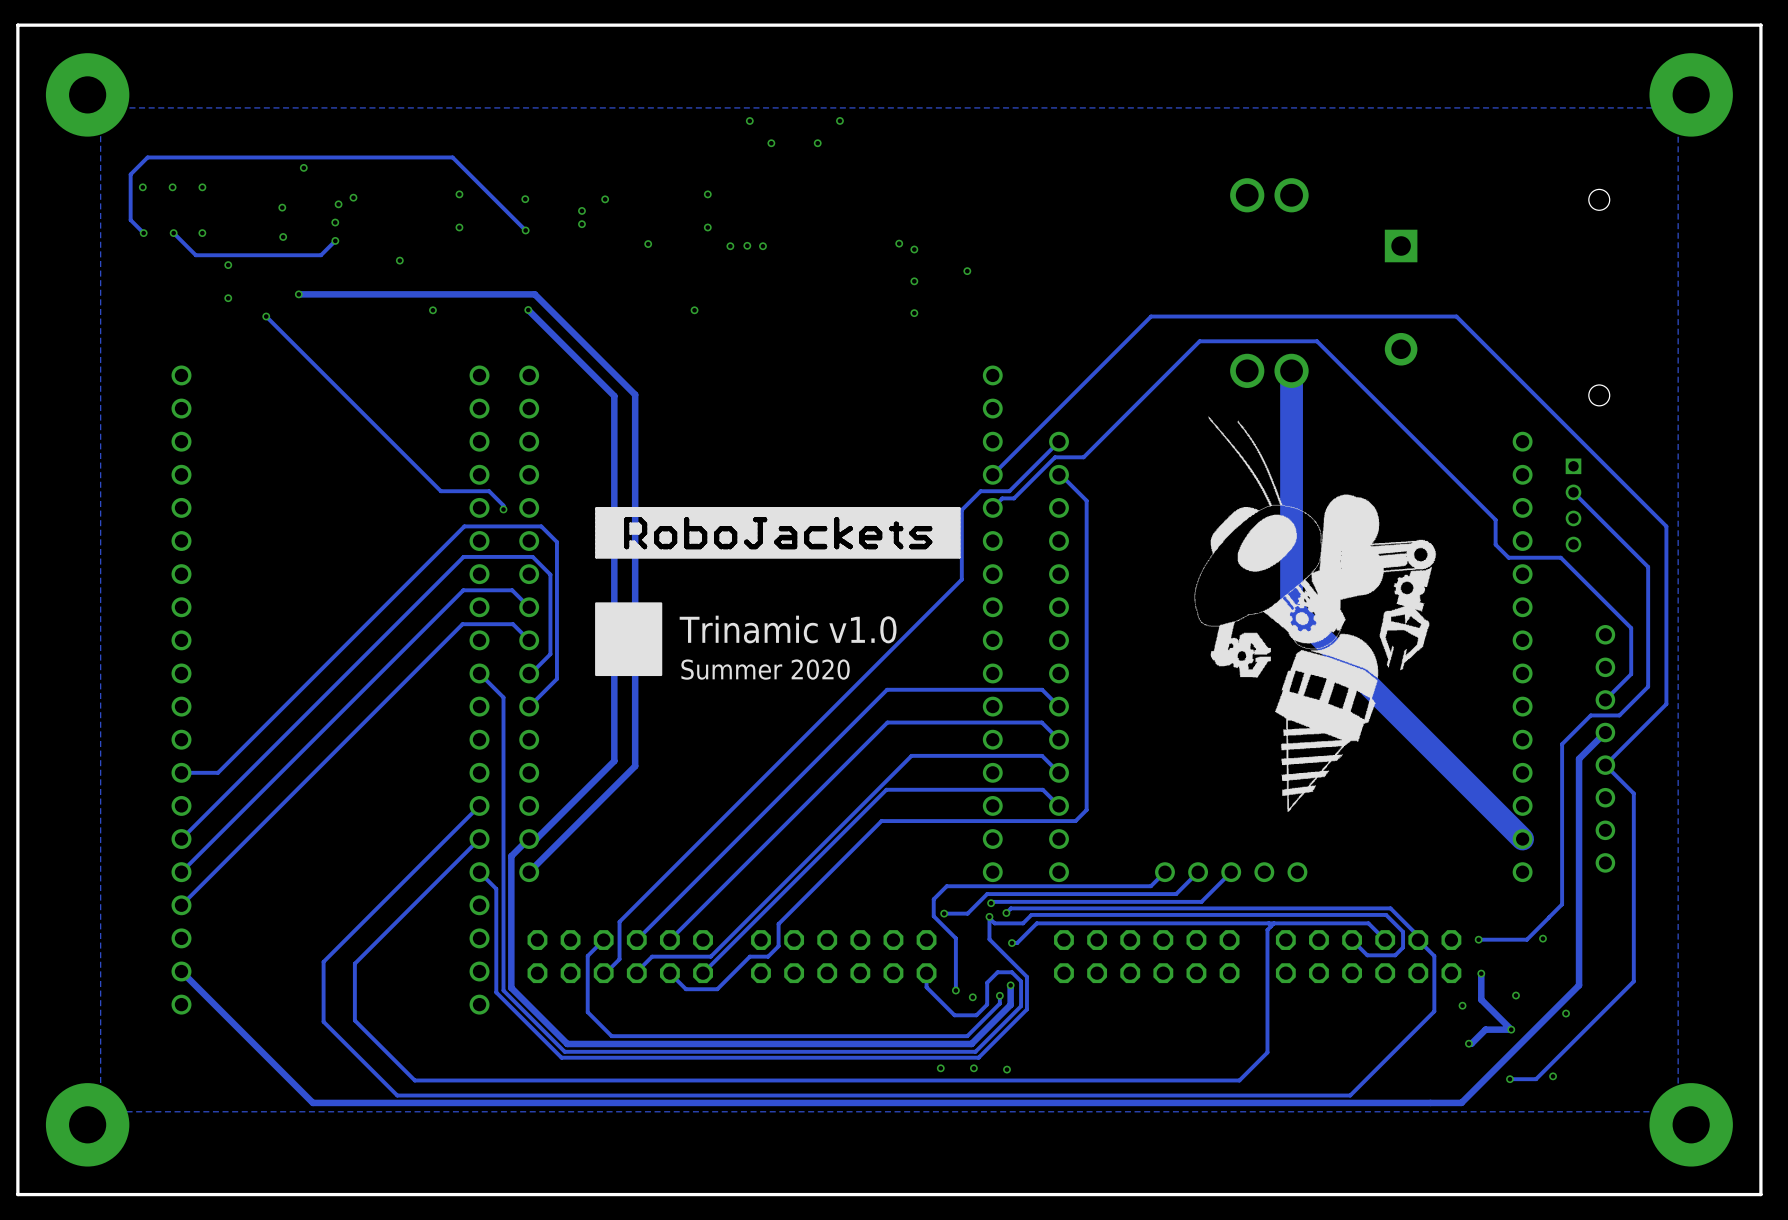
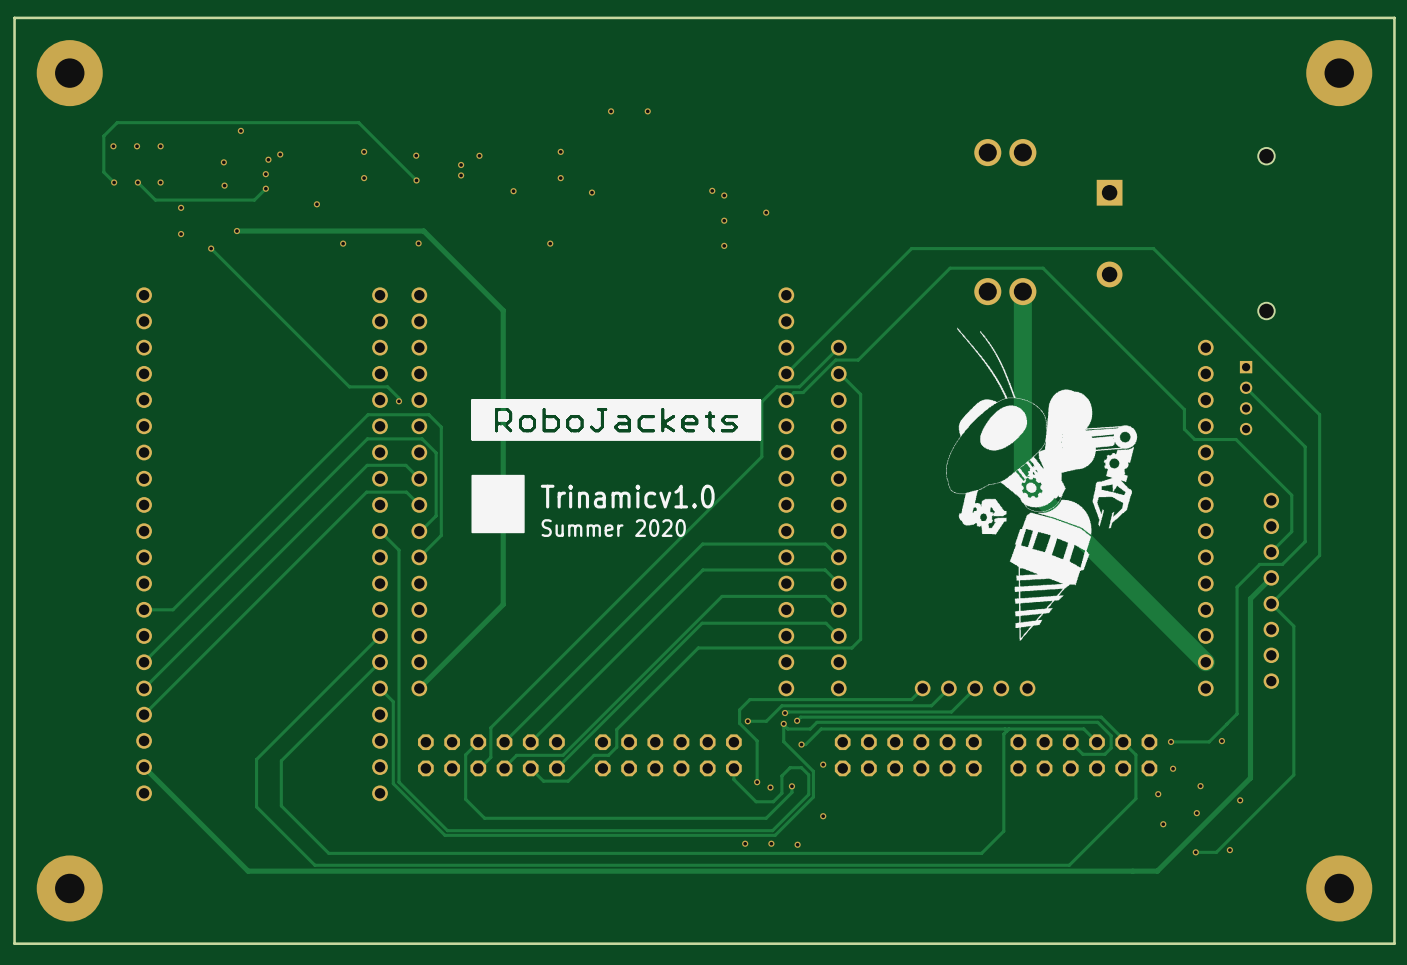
zone outline: (1678, 107) (1678, 1111) (100, 1111) (100, 107) (1678, 107) -> none
via: (749, 120) -> none
via: (839, 120) -> none
via: (730, 246) -> none
via: (762, 246) -> none
track: (528, 310) (614, 396) (614, 761) (536, 839) (528, 839) (511, 856) (511, 987) (567, 1043) (971, 1043) (1010, 1004) (1010, 985) -> none
via: none -> (823, 764)
track: (1481, 973) (1481, 999) (1511, 1029) (1485, 1029) (1471, 1043) (1468, 1043) -> none
via: (1010, 985) -> none
via: none -> (823, 816)

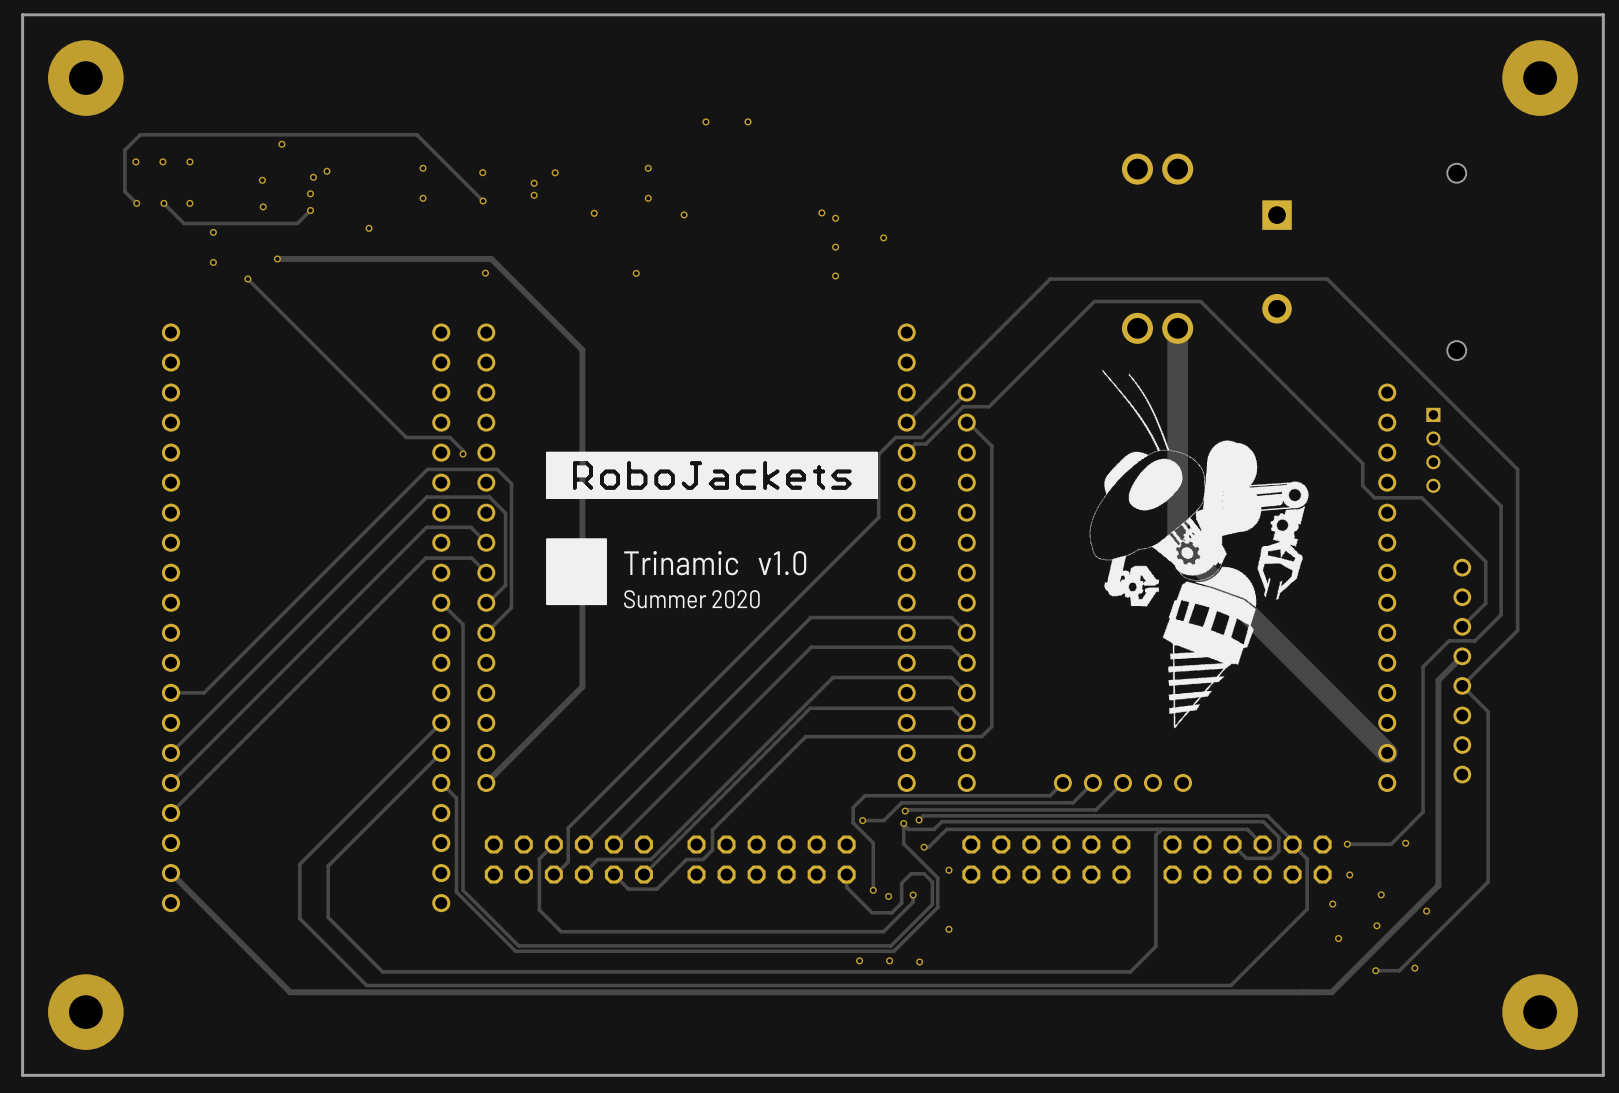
via: (343, 243) -> none

